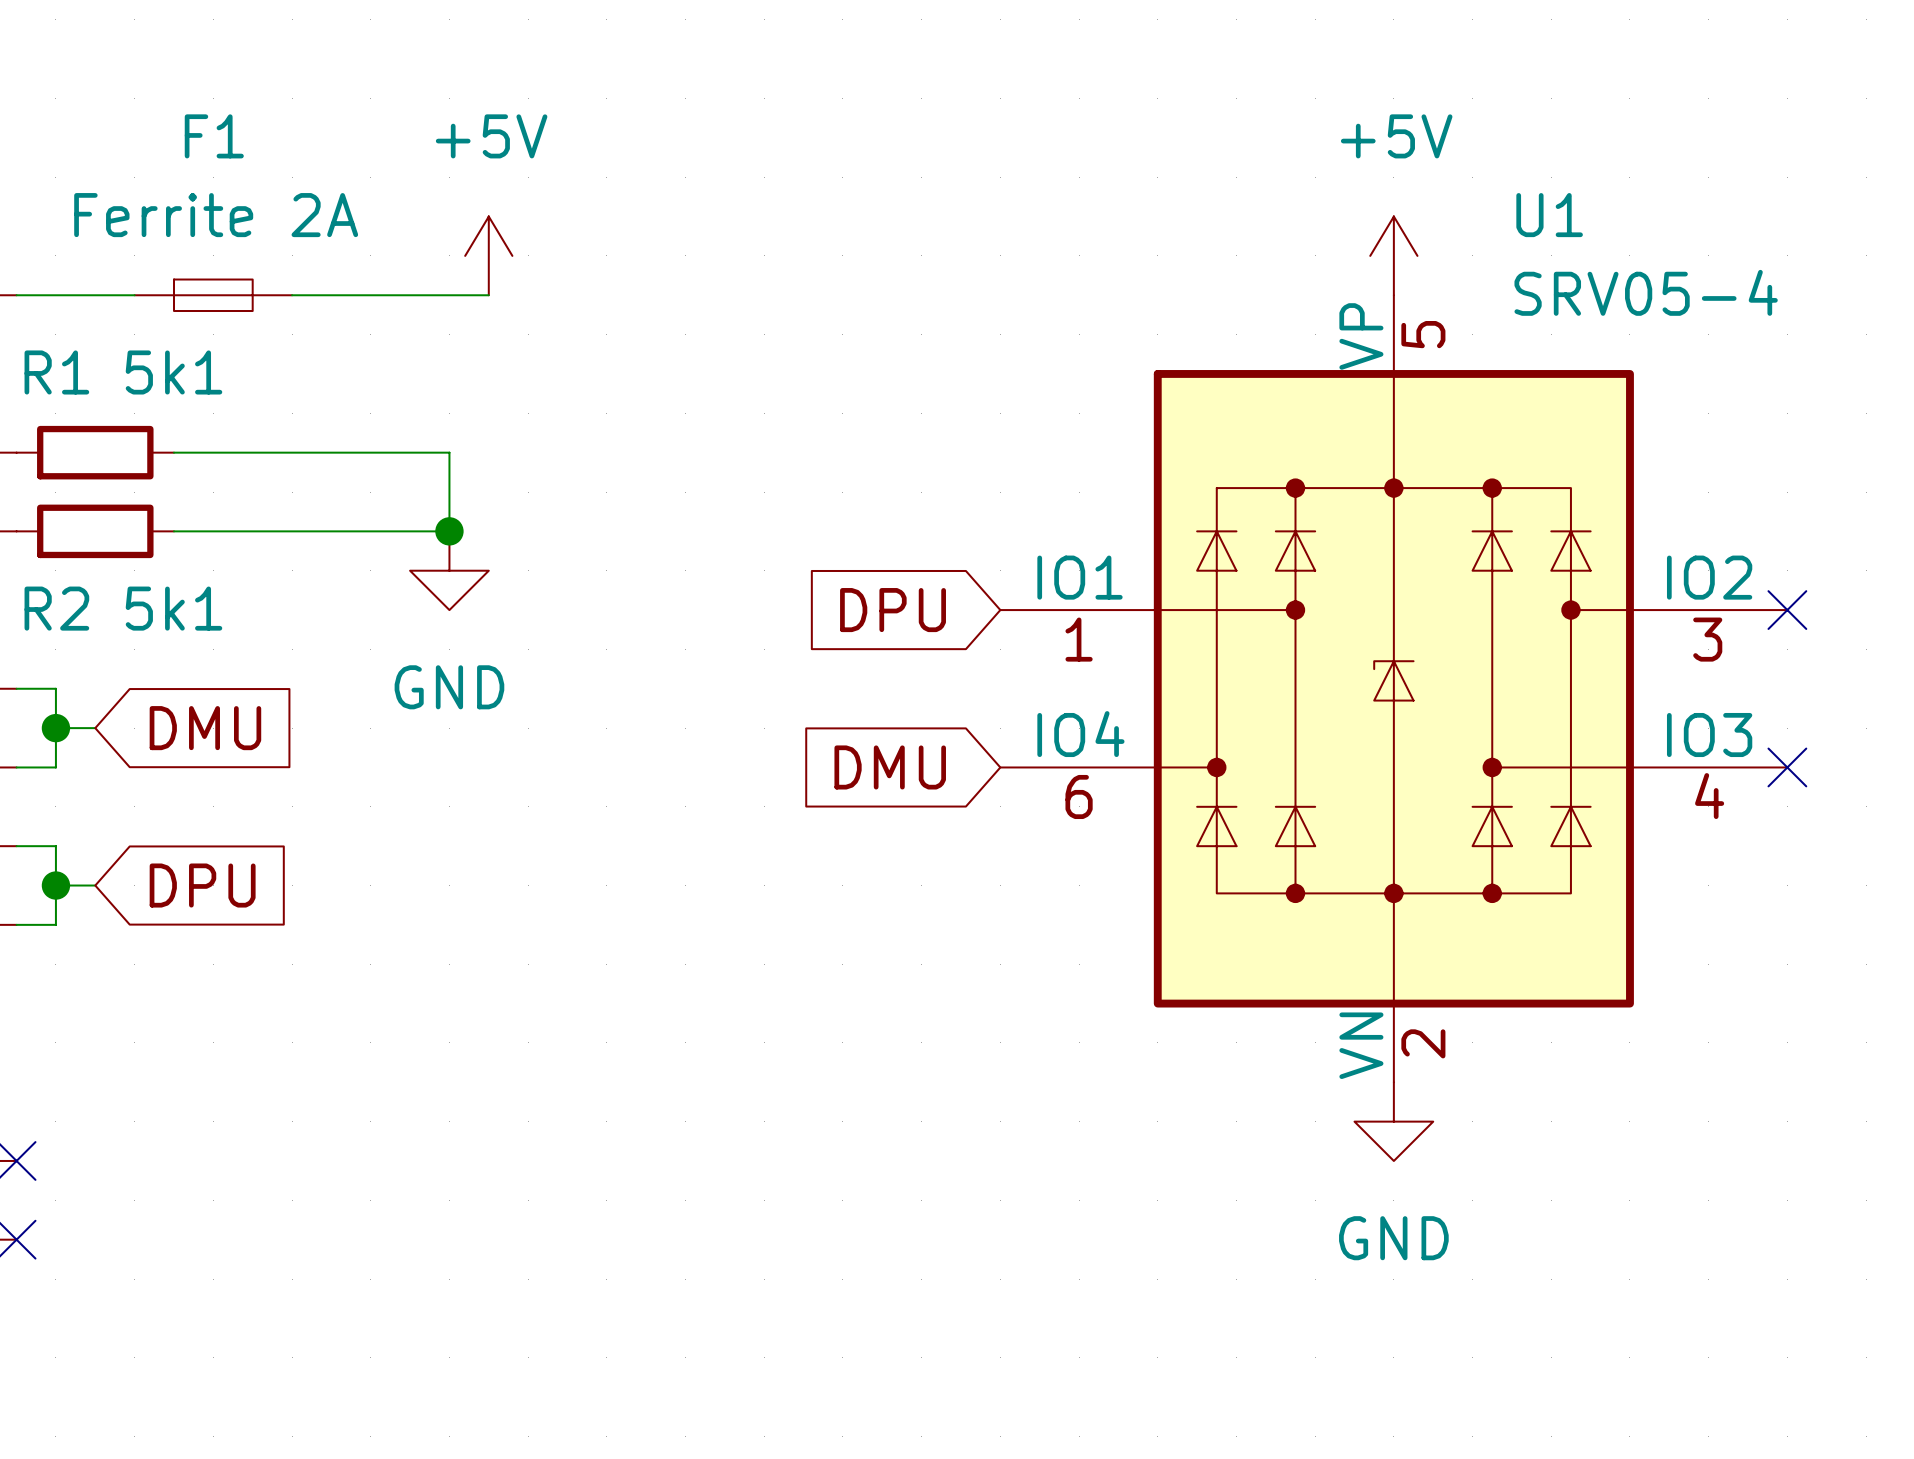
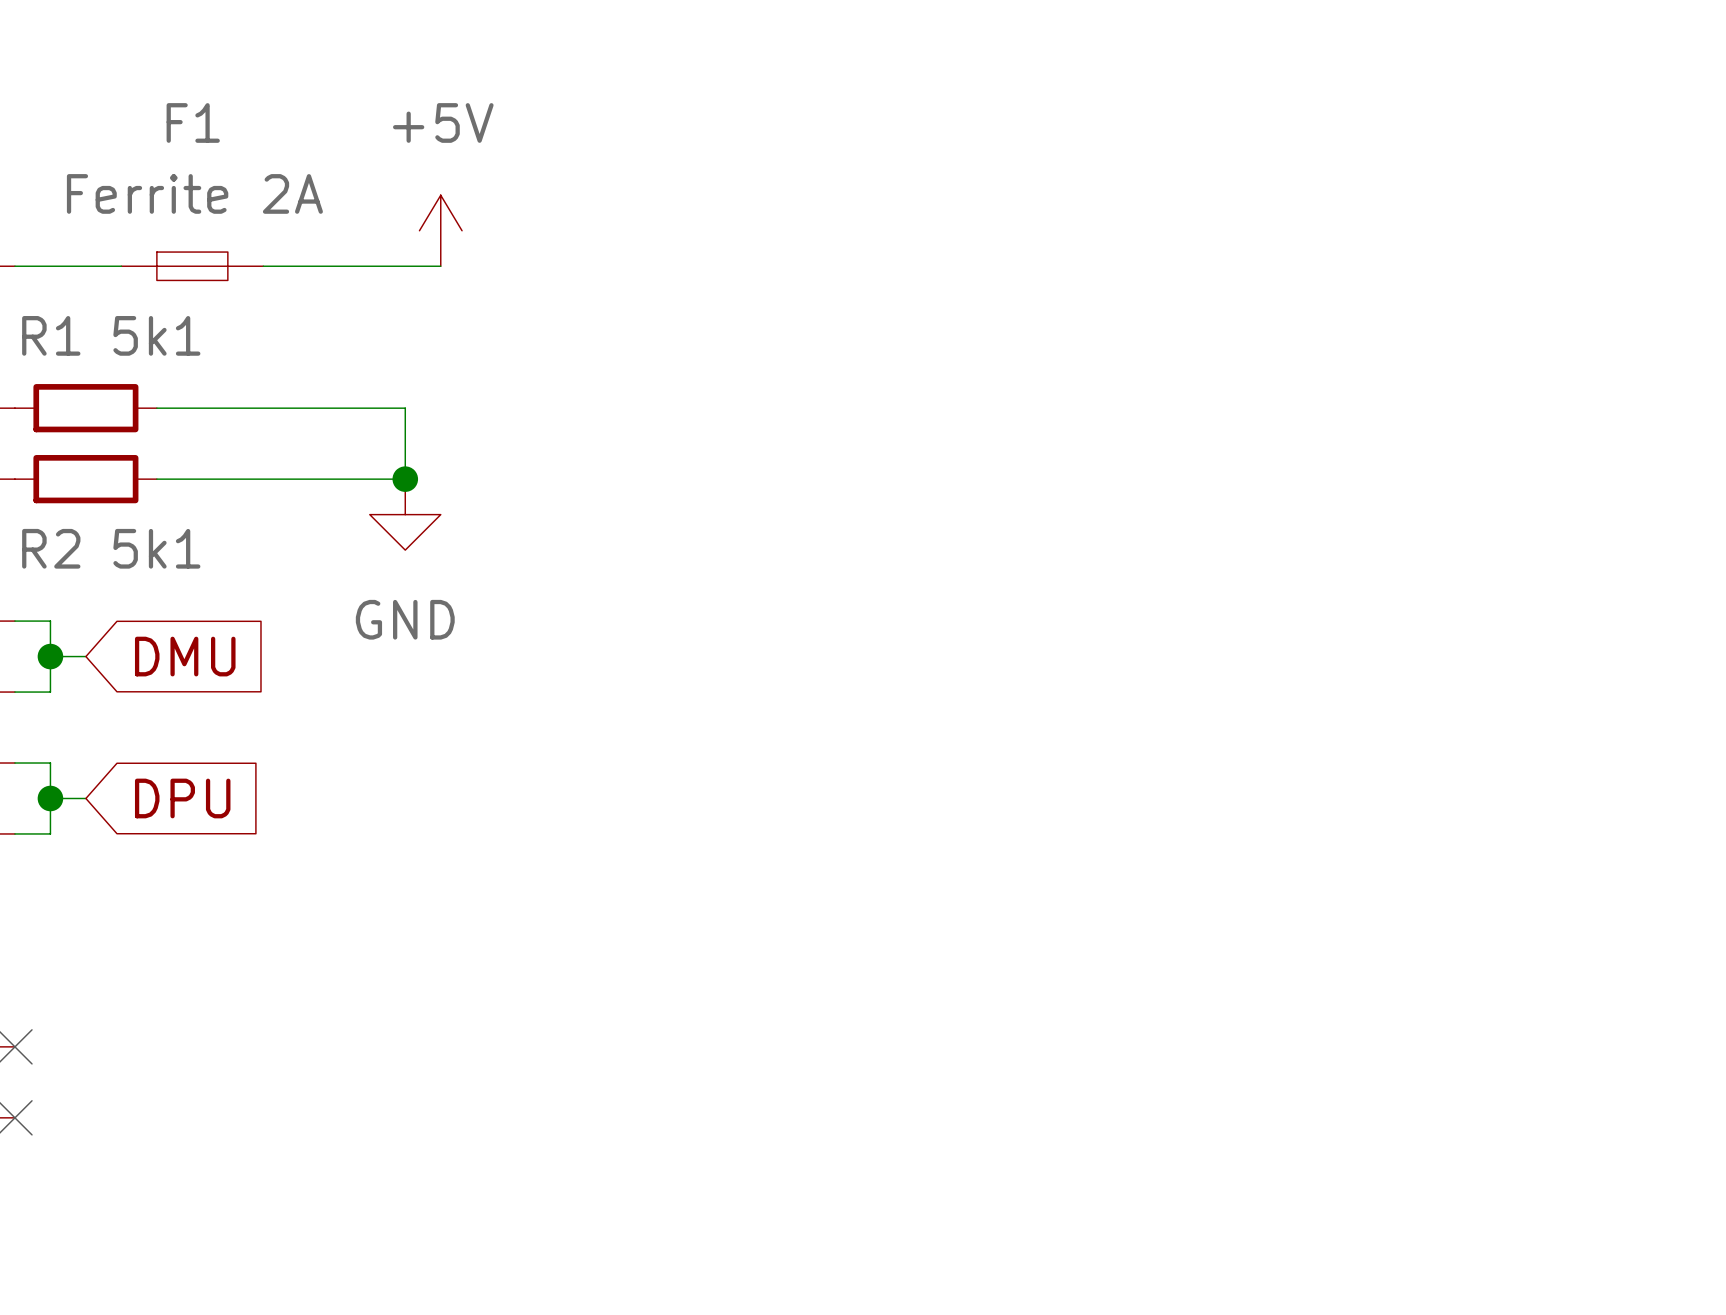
power symbol: +5V (1393, 255) -> none
global label: DPU (893, 610) -> none
no-connect mark: (1787, 610) -> none
U1: SRV05-4 (1393, 688) -> none
global label: DMU (890, 767) -> none
no-connect mark: (1787, 767) -> none
power symbol: GND (1393, 1121) -> none

